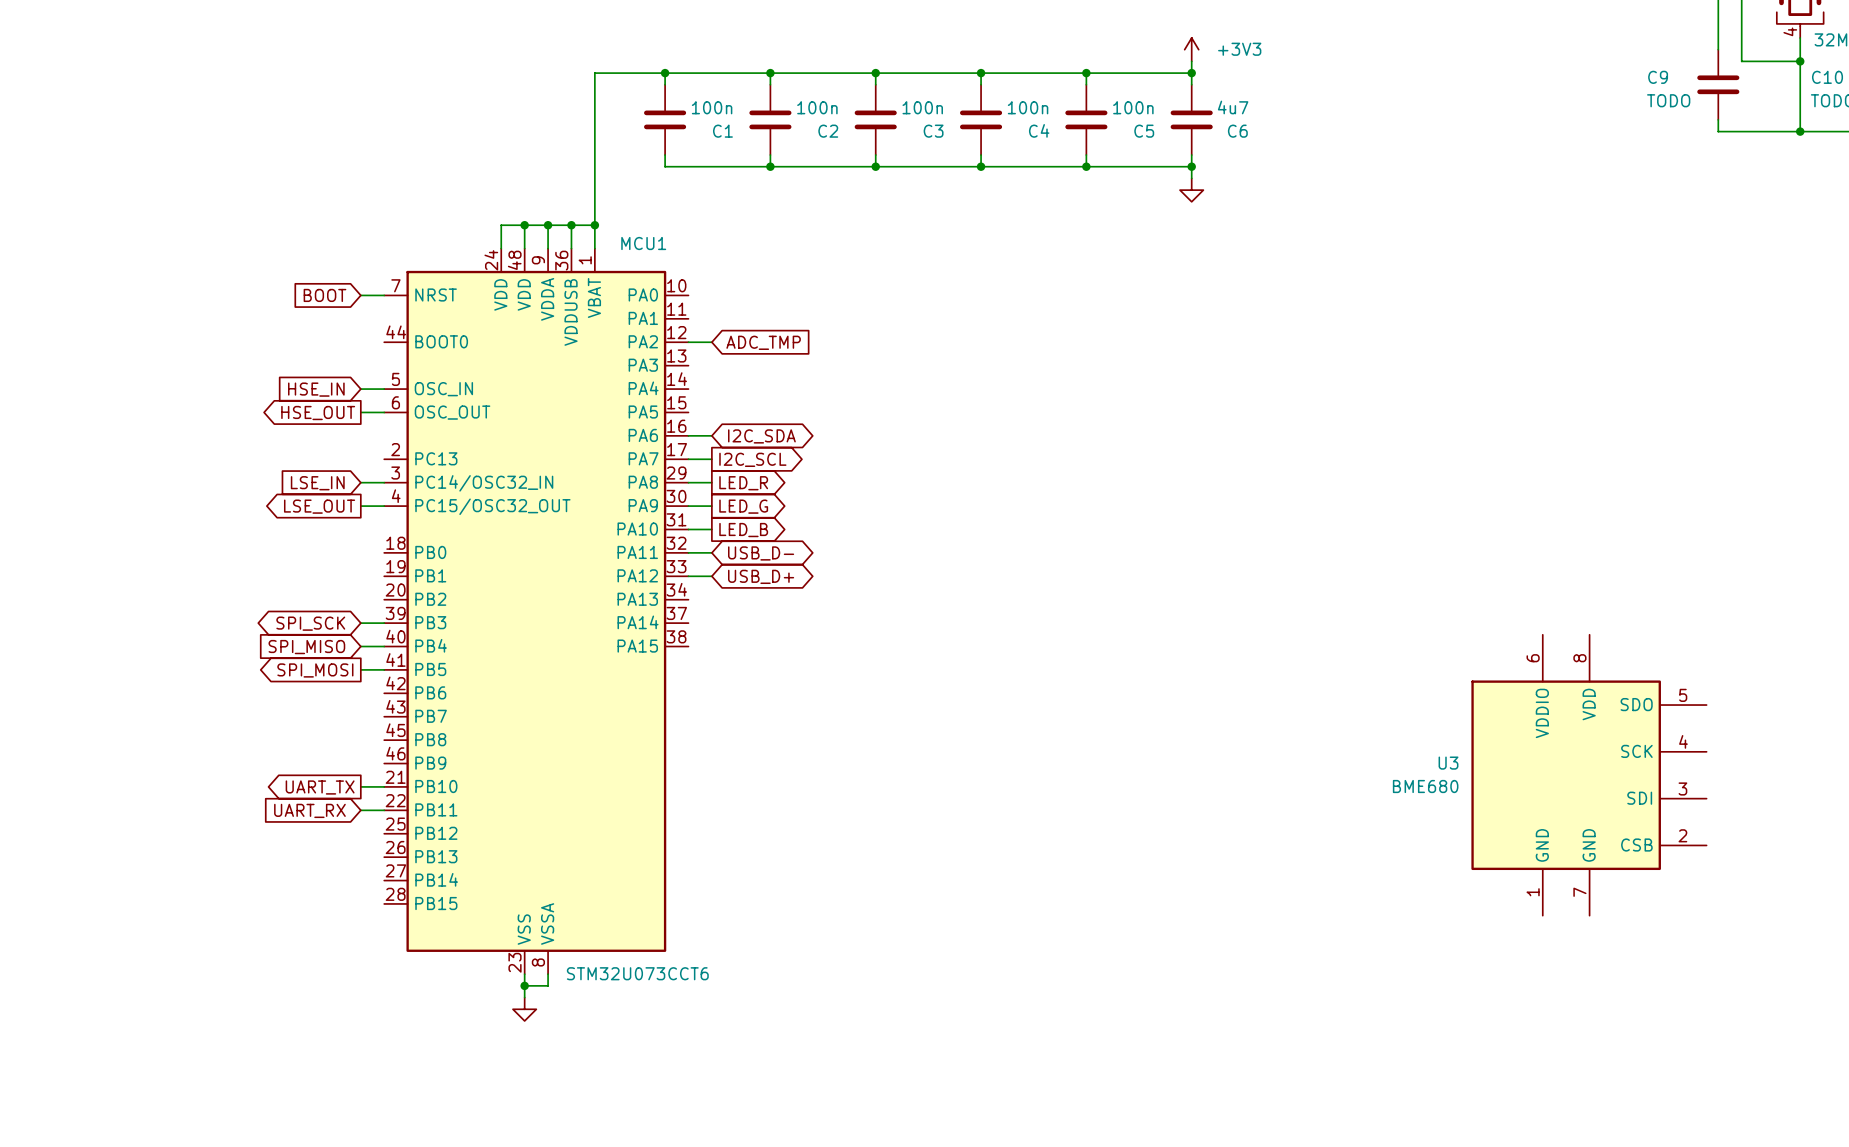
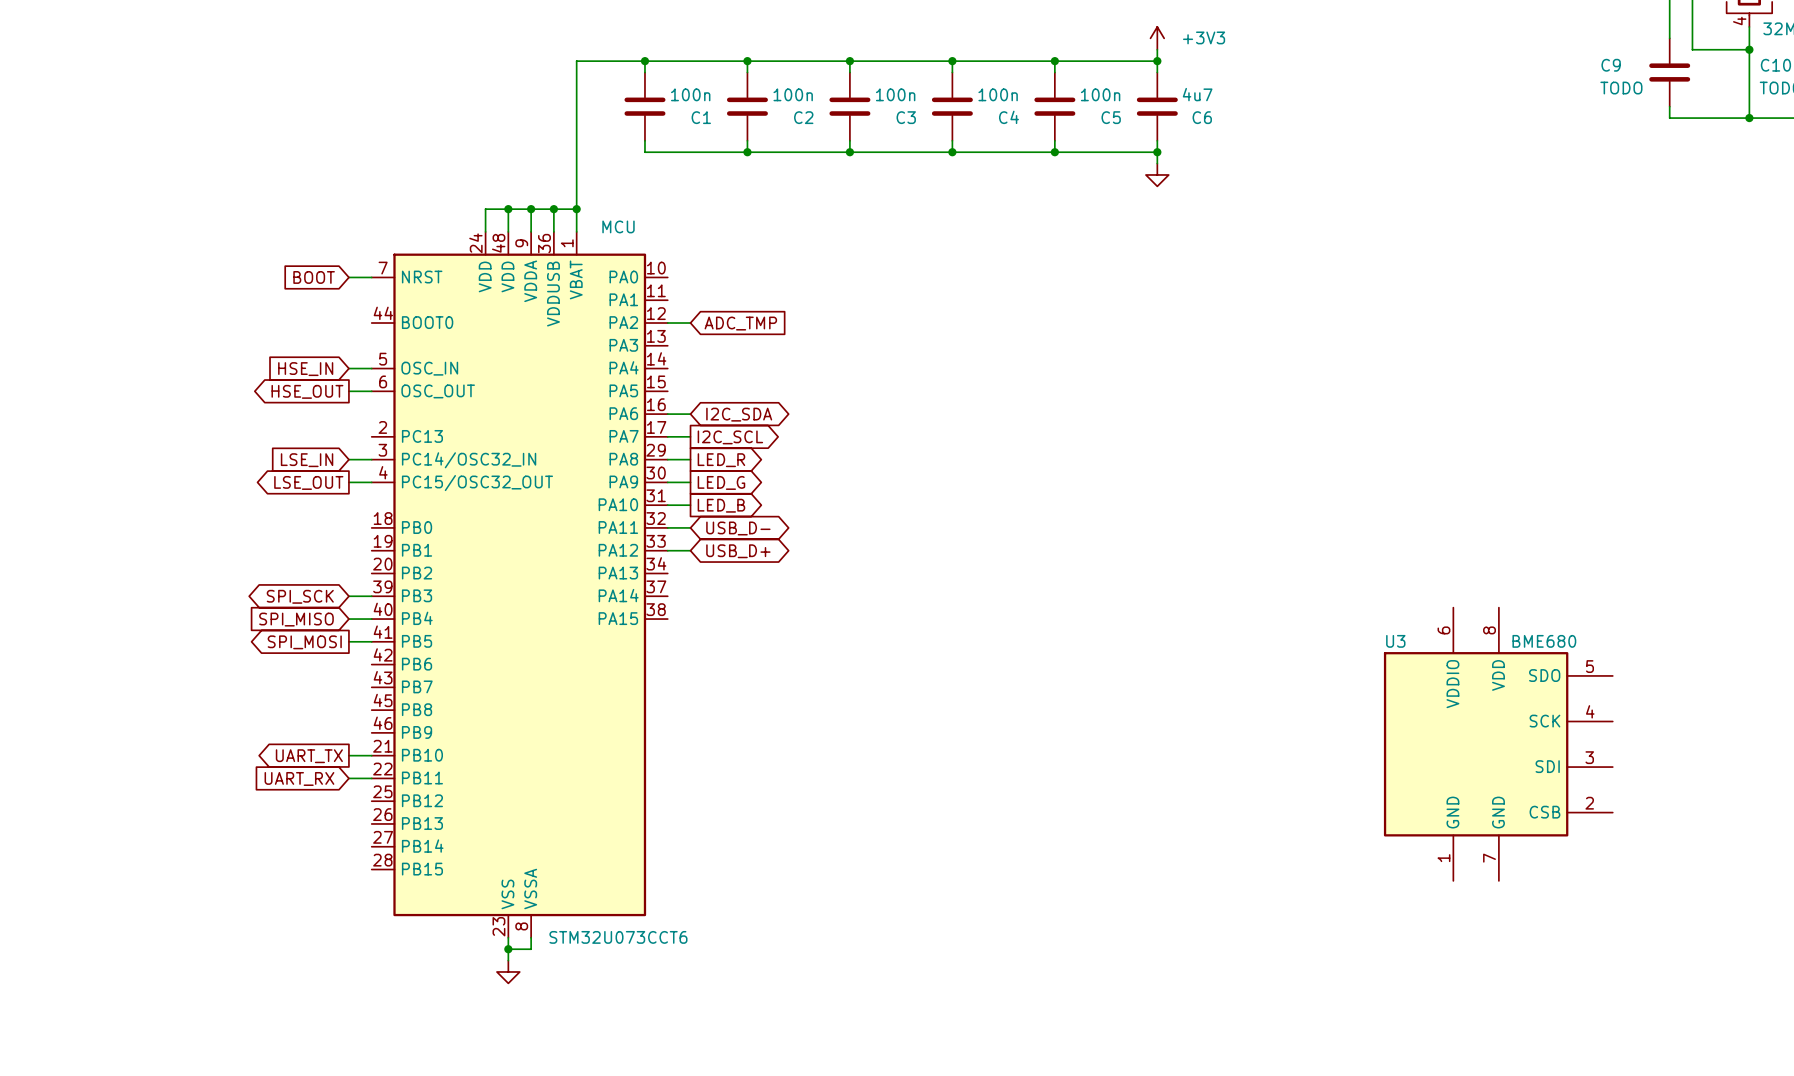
MCU1 name: MCU1 (643, 243) -> MCU (618, 226)
U3 name position: U3 (1448, 763) -> U3 (1395, 641)
U3 position: (1588, 775) -> (1498, 744)
U3 value position: BME680 (1425, 786) -> BME680 (1544, 641)

